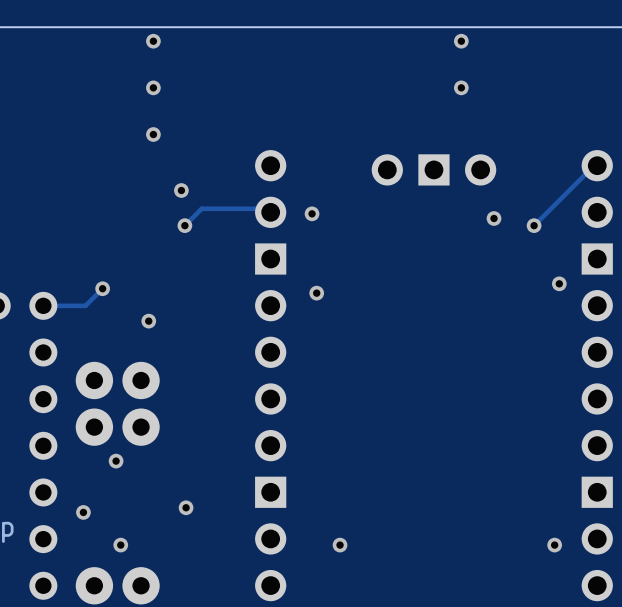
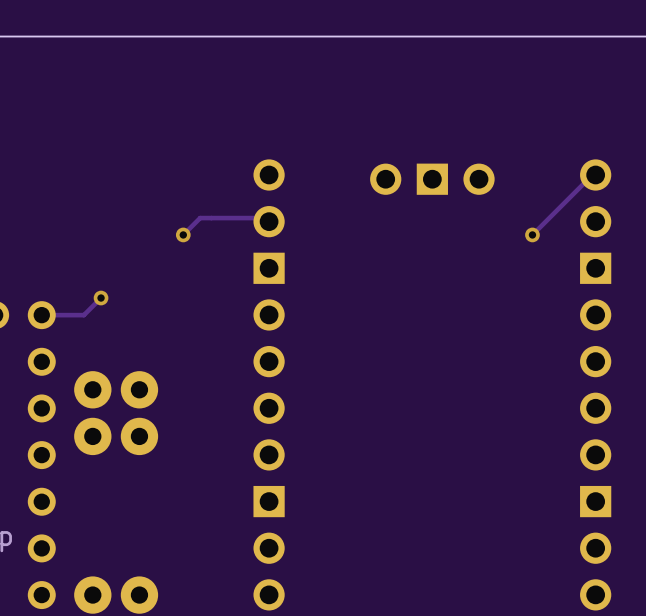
via: (153, 41) -> none
via: (461, 41) -> none
via: (153, 87) -> none
via: (461, 87) -> none
via: (153, 134) -> none
via: (181, 190) -> none
via: (312, 213) -> none
via: (494, 218) -> none
via: (559, 283) -> none
via: (316, 293) -> none
via: (148, 321) -> none
via: (116, 461) -> none
via: (186, 507) -> none
via: (83, 512) -> none
via: (120, 545) -> none
via: (340, 545) -> none
via: (554, 545) -> none

